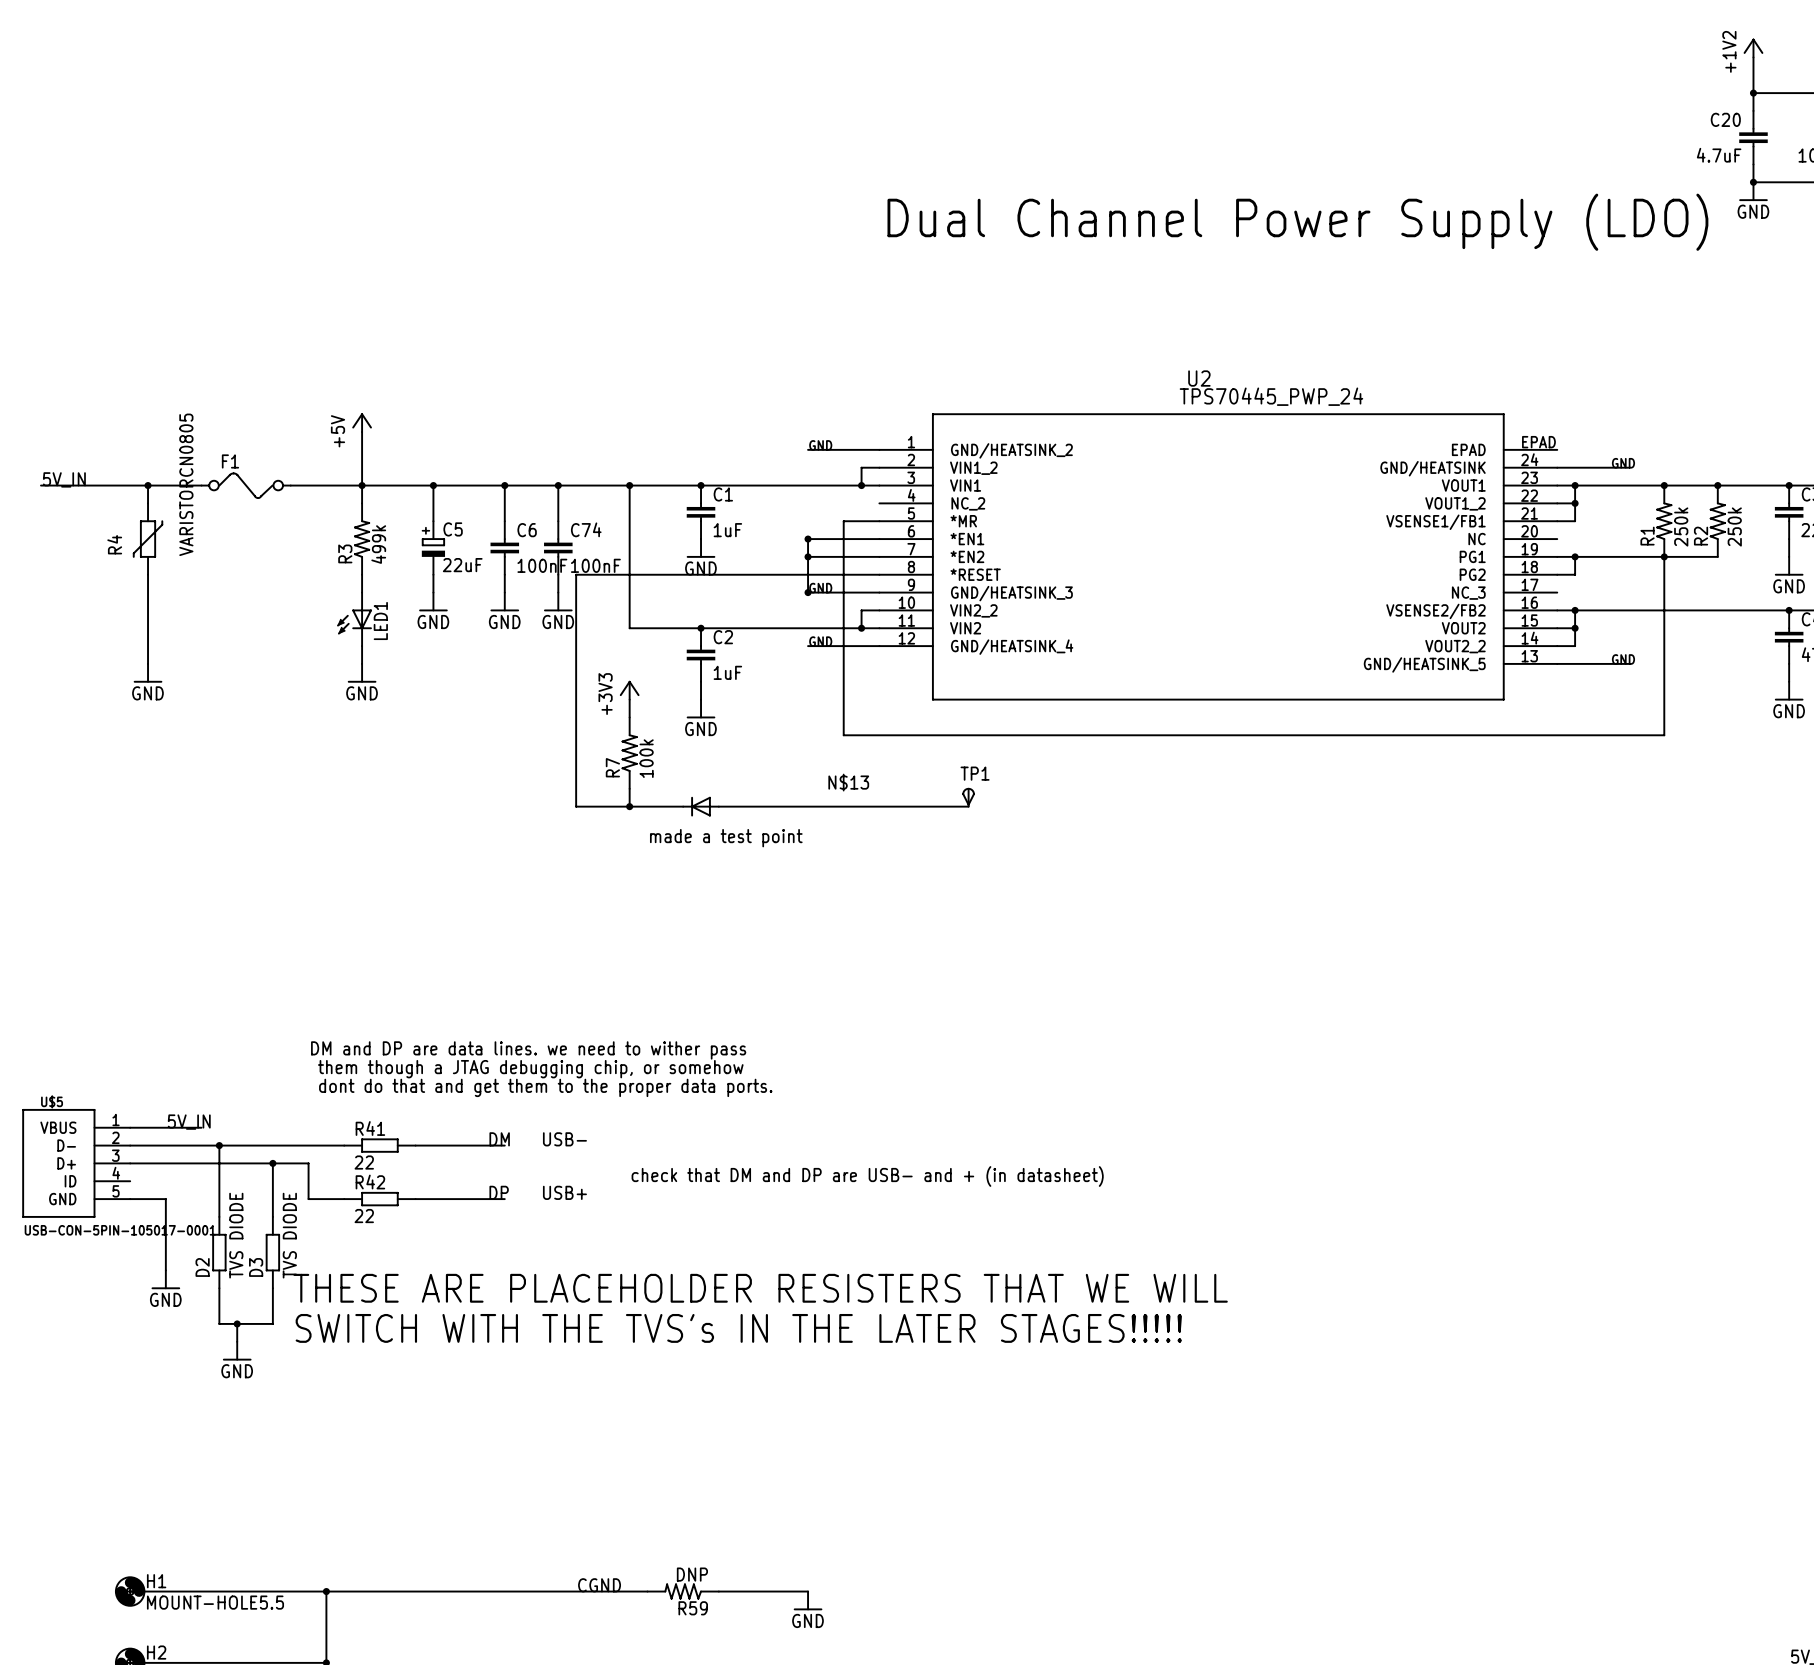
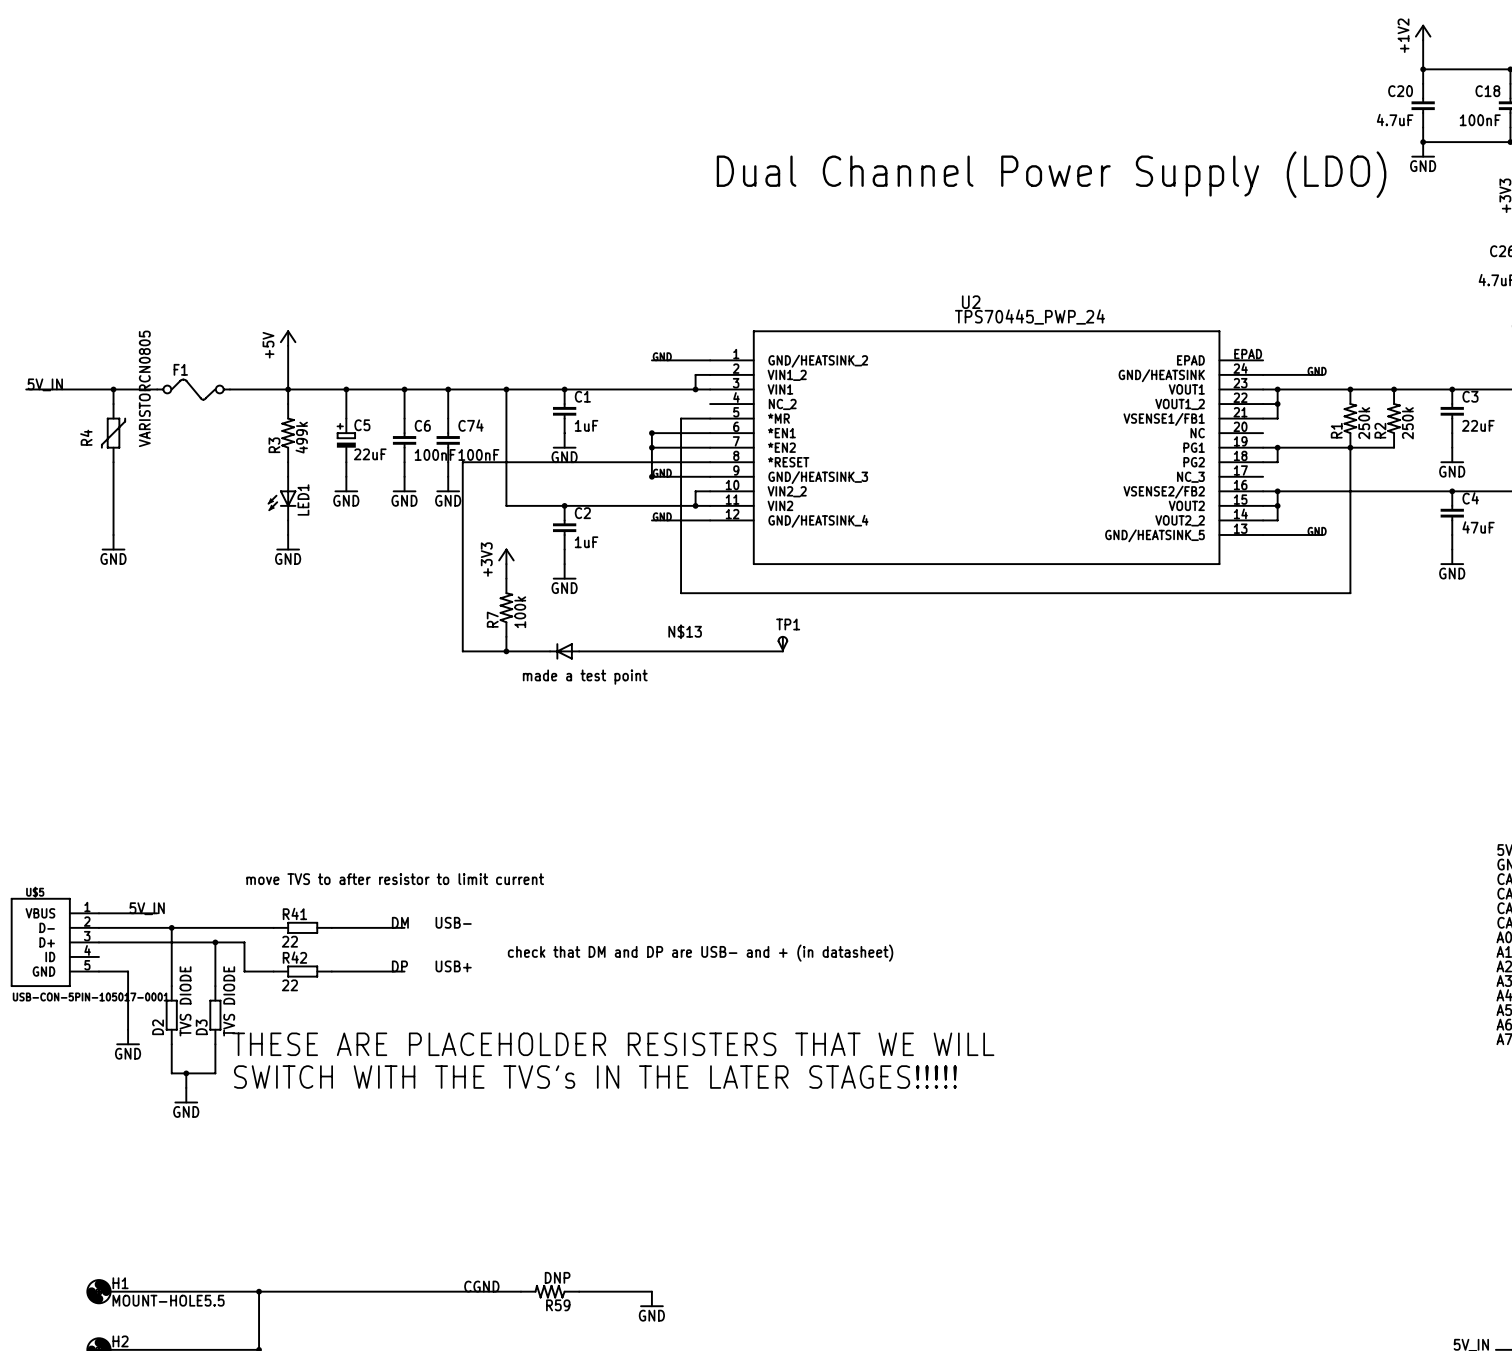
text: DM and DP are data lines. we need to wither pass (528, 1050) -> none
text: them though a JTAG debugging chip, or somehow (530, 1069) -> none
text: dont do that and get them to the proper data ports. (545, 1087) -> move TVS to after resistor to limit current (395, 879)

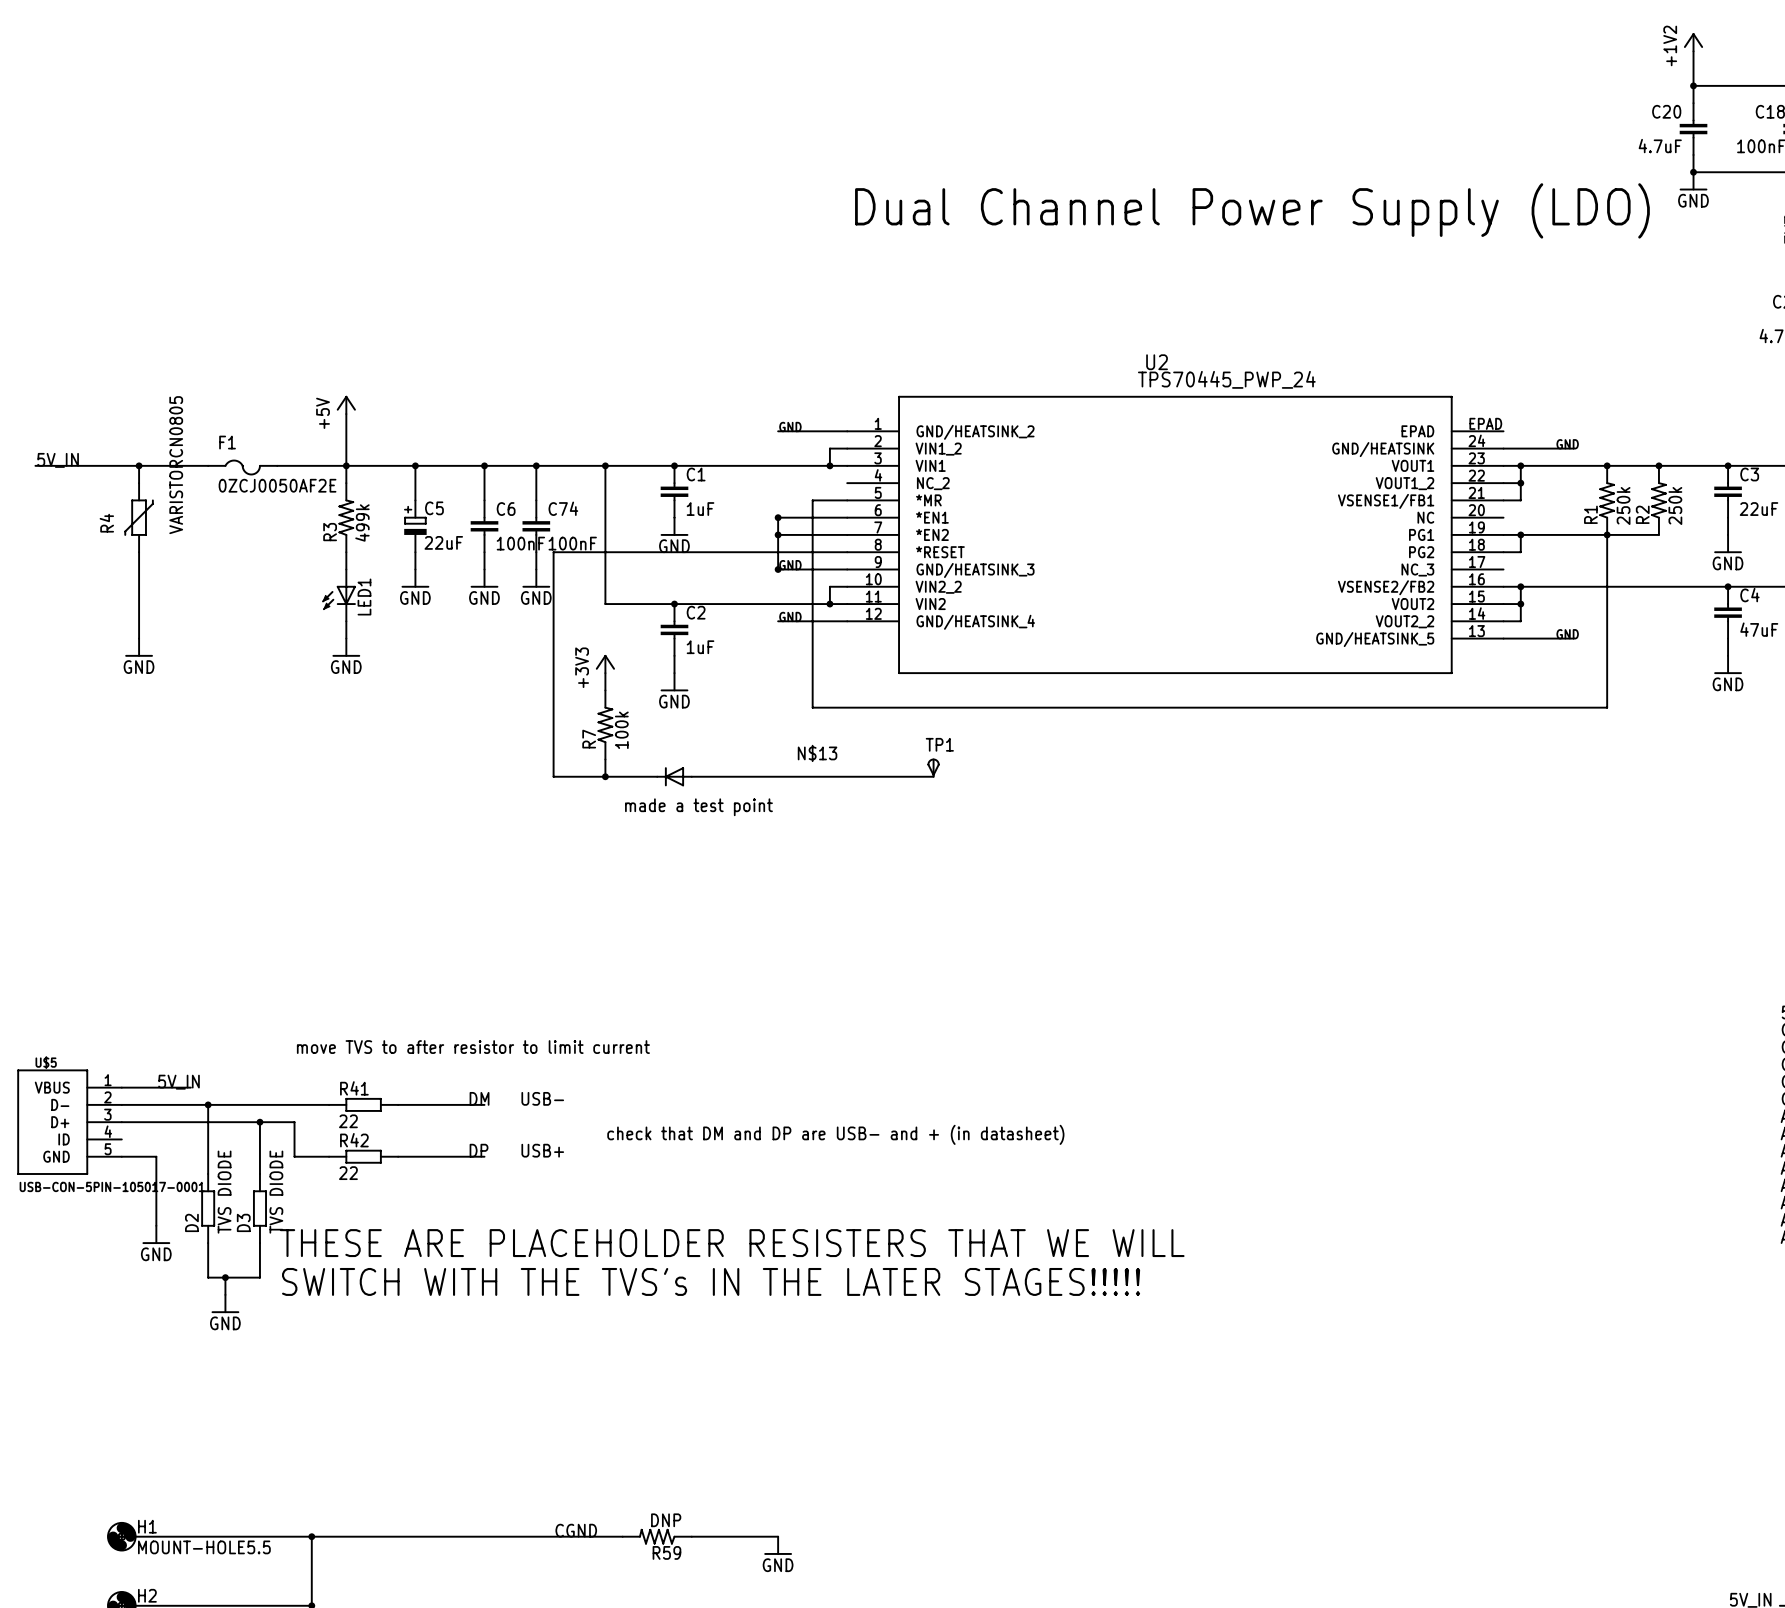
F1 symbol: [157, 378, 230, 401] -> [208, 459, 278, 476]
F1 value: none -> 0ZCJ0050AF2E (277, 485)

